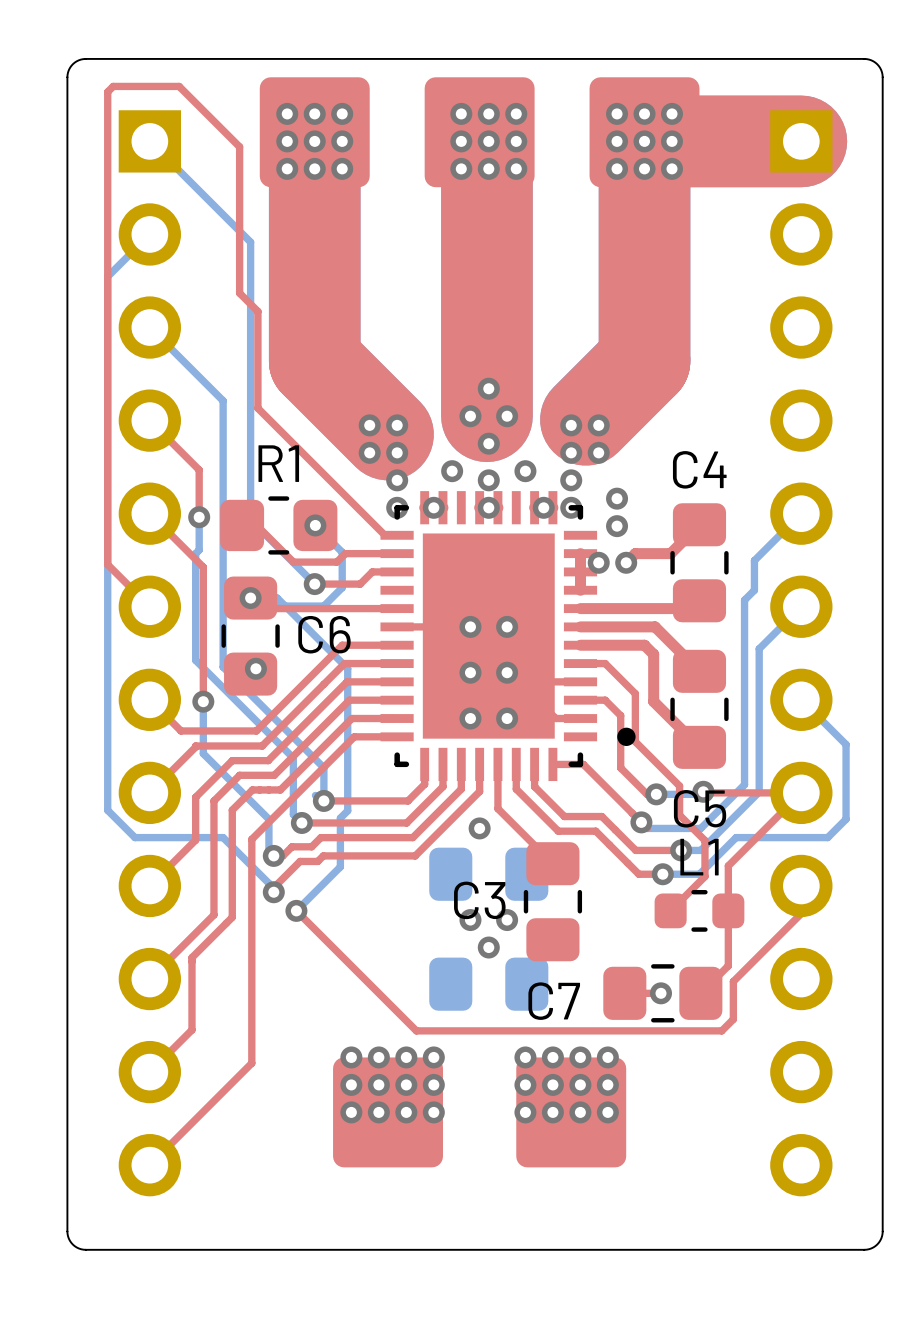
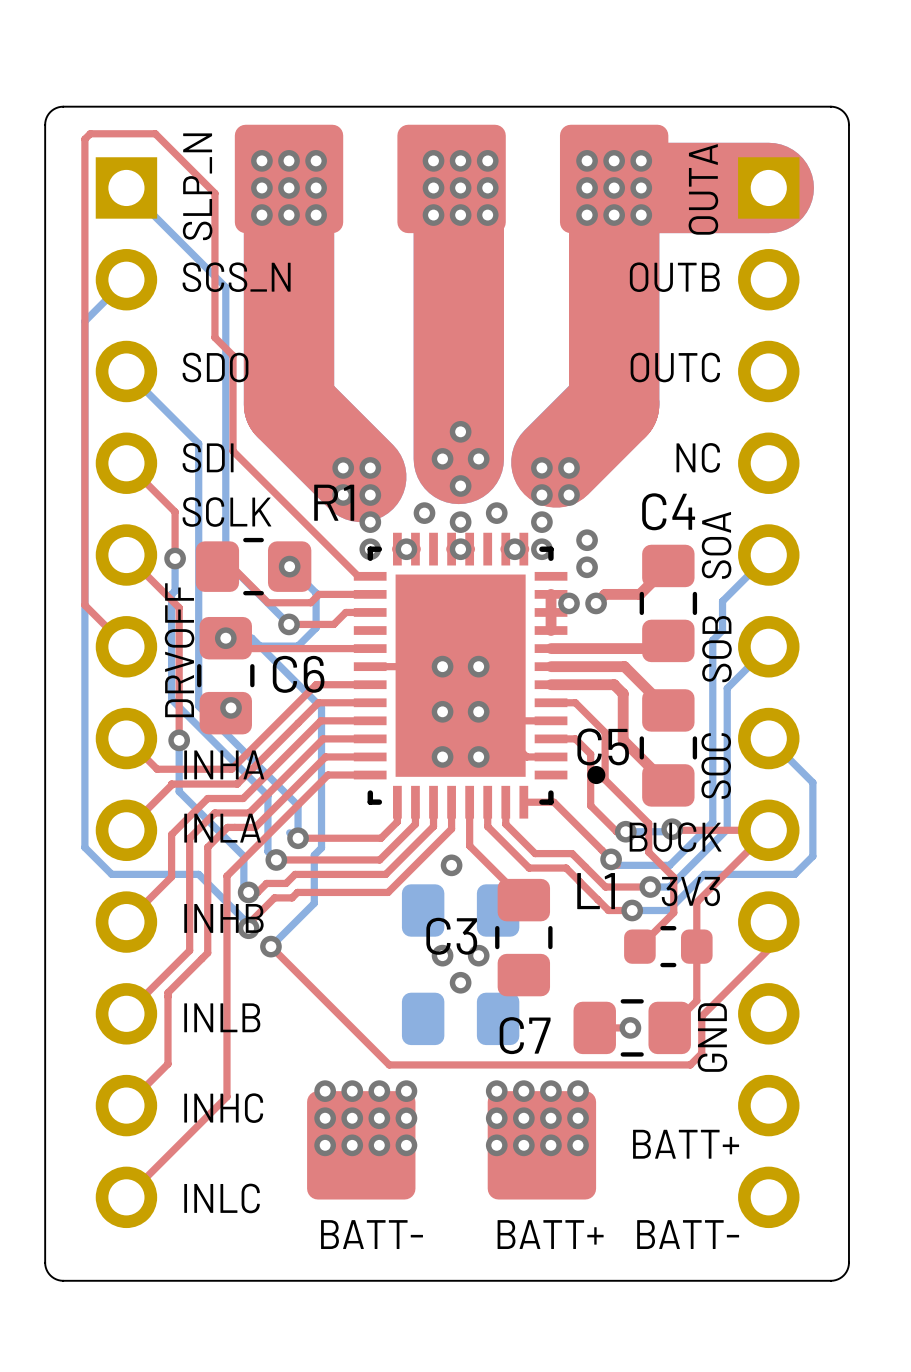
text: none -> SLP_N (197, 186)
text: none -> OUTA (703, 189)
text: none -> SCS_N (236, 277)
text: none -> OUTB (674, 277)
text: none -> SDO (215, 367)
text: none -> OUTC (675, 367)
text: none -> SDI (208, 457)
text: none -> NC (698, 457)
R1 name position: R1 (278, 463) -> R1 (334, 502)
text: none -> SCLK (226, 512)
text: none -> SOA (716, 545)
text: none -> SOB (716, 649)
text: none -> DRVOFF (179, 650)
text: none -> INHA (224, 764)
text: none -> SOC (716, 765)
text: none -> INLA (222, 828)
text: none -> BUCK (675, 837)
C5 name position: C5 (700, 808) -> C5 (603, 746)
text: none -> 3V3 (690, 891)
L1 name position: L1 (699, 857) -> L1 (596, 891)
text: none -> INHB (223, 918)
text: none -> INLB (222, 1017)
text: none -> GND (712, 1037)
text: none -> INHC (223, 1108)
text: none -> BATT+ (686, 1144)
text: none -> INLC (222, 1198)
text: none -> BATT- (372, 1234)
text: none -> BATT+ (550, 1234)
text: none -> BATT- (688, 1234)

